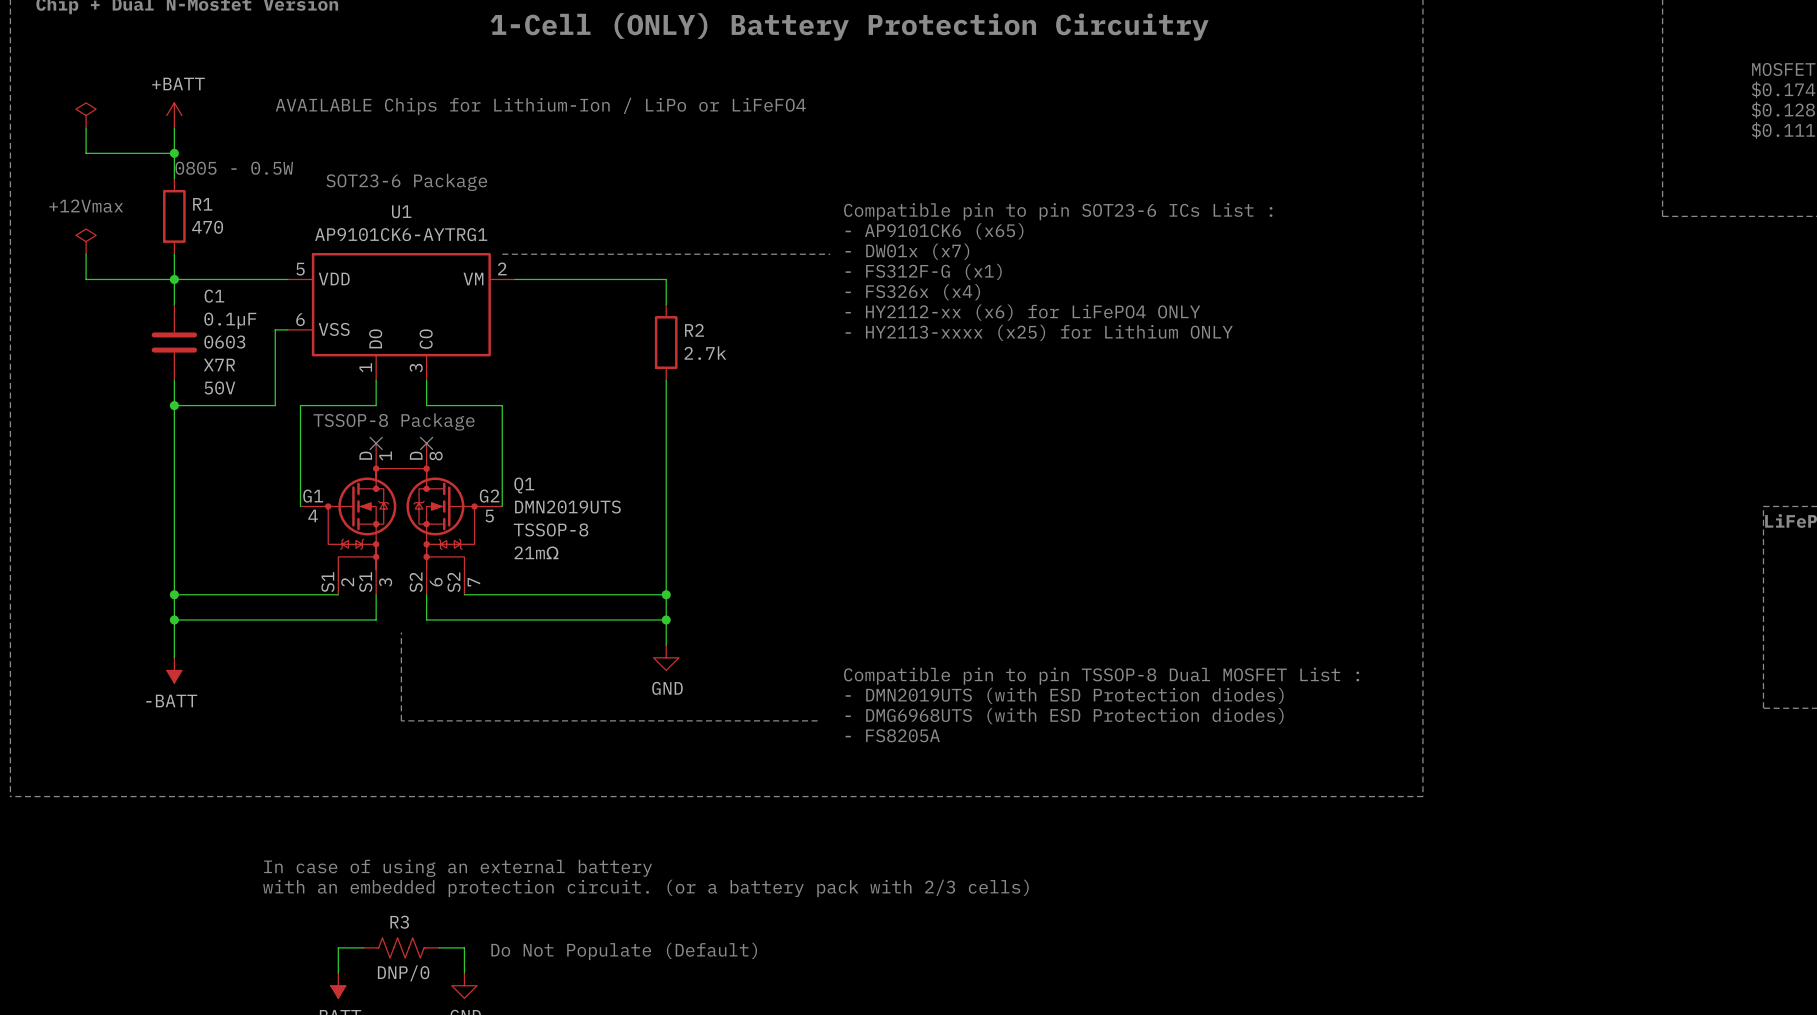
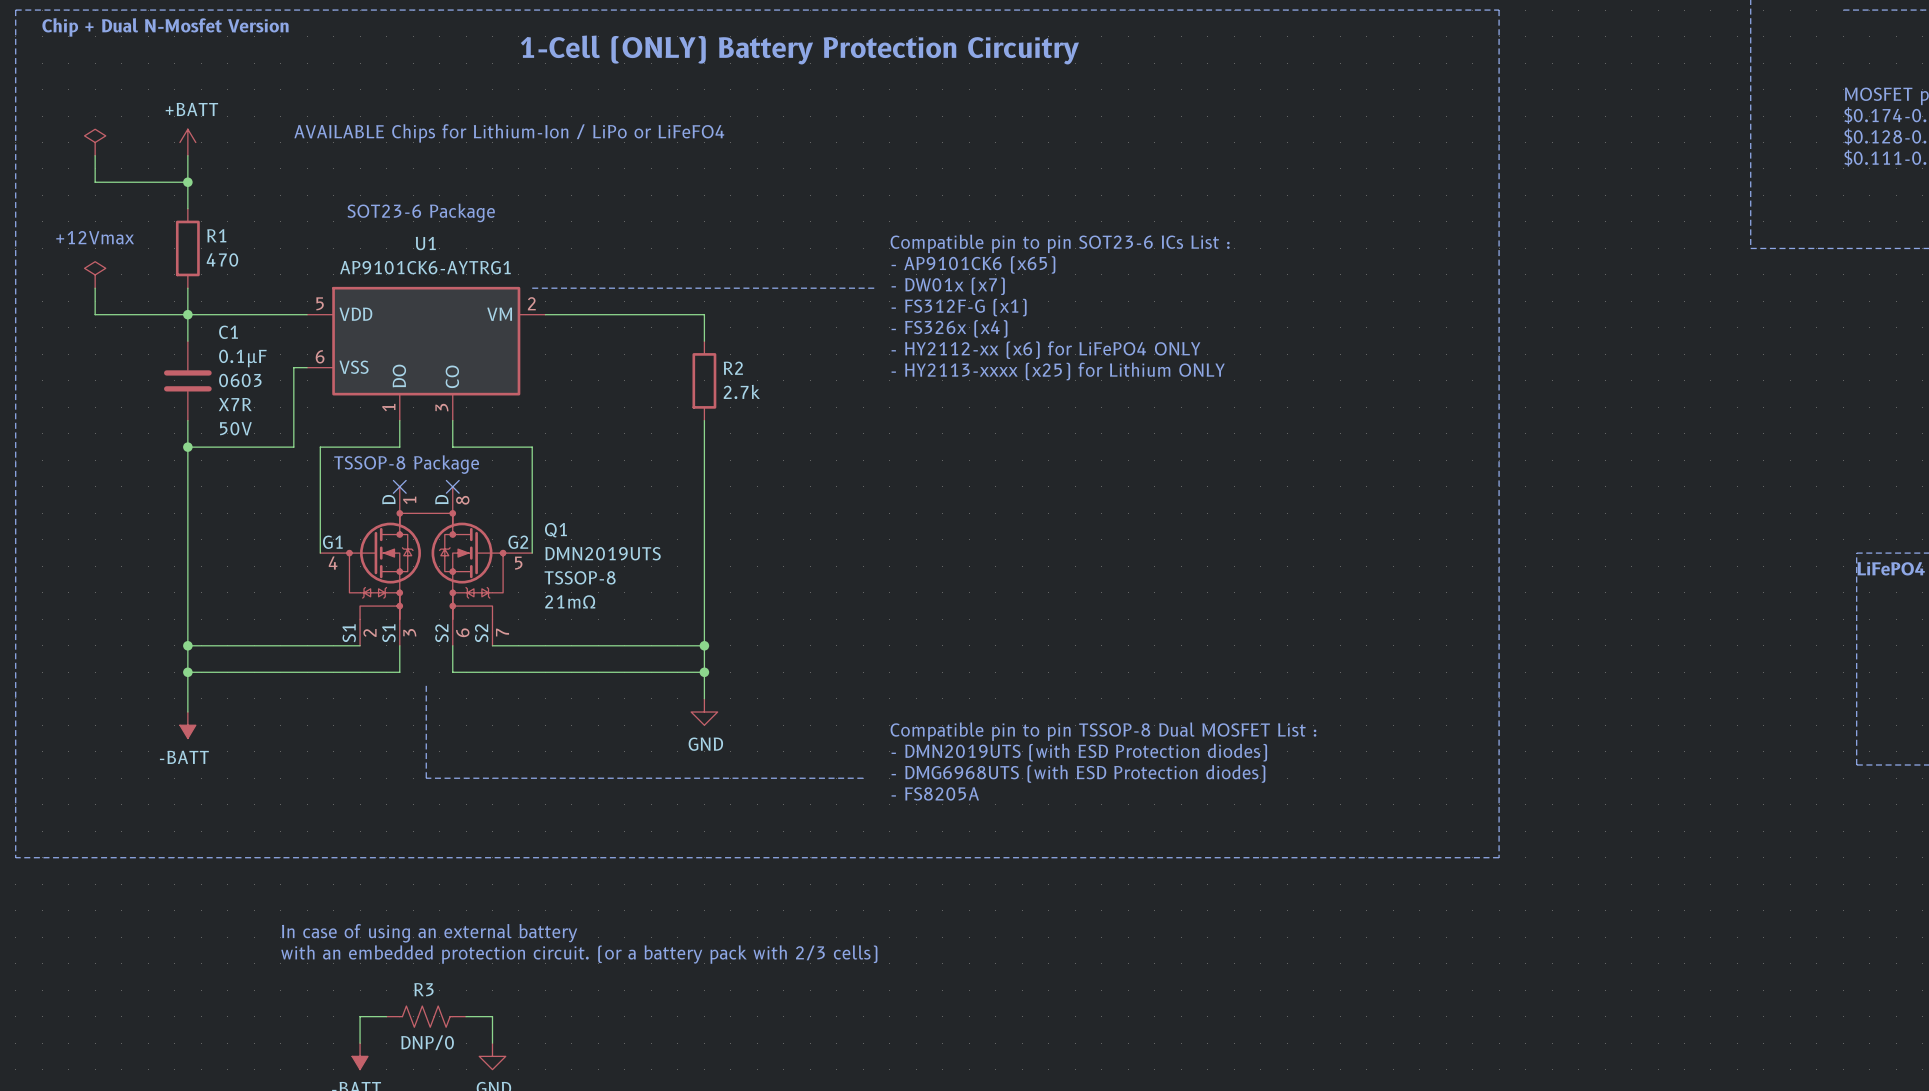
text: 0805 - 0.5W (234, 168) -> none
text: Do Not Populate (Default) (624, 951) -> none

